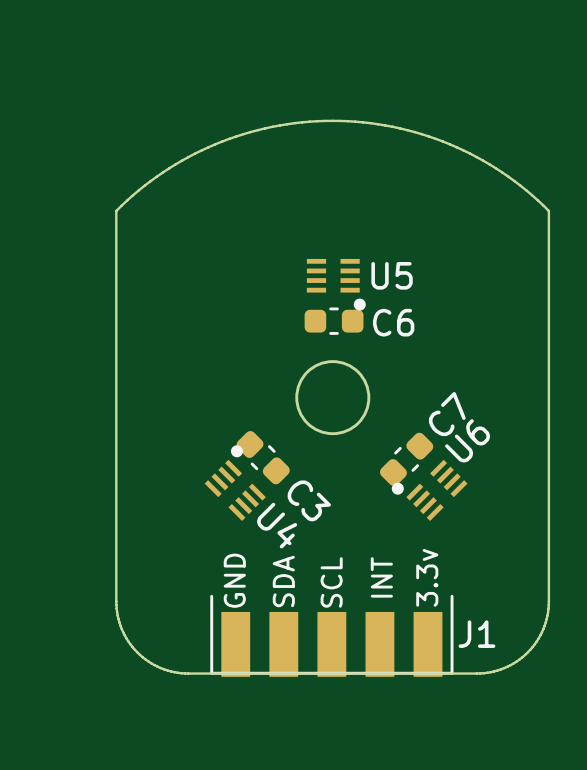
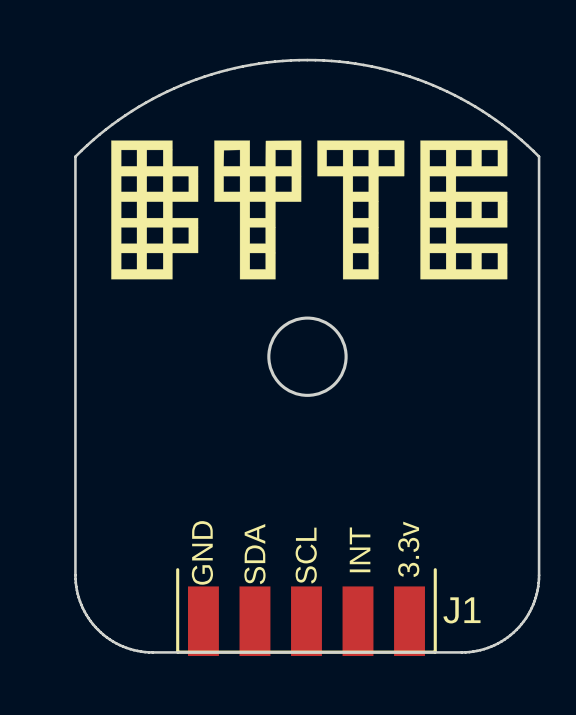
drawing: none -> [111, 140, 508, 280]
U5: (336, 284) -> none
C6: (334, 321) -> none
C3: (263, 457) -> none
C7: (406, 459) -> none
U4: (235, 483) -> none
U6: (429, 490) -> none

